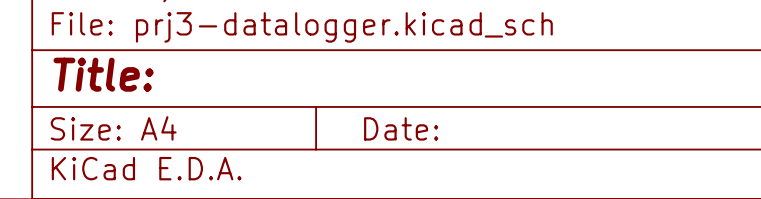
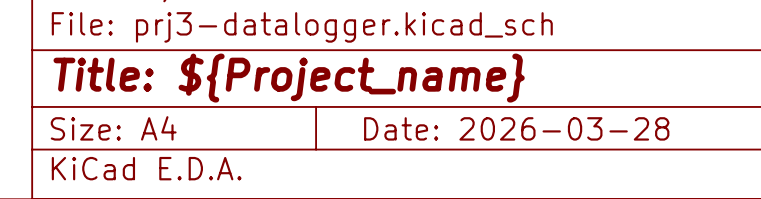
title block: Title: (103, 74) -> Title: ${Project_name} (289, 78)
title block: Date: (401, 128) -> Date: 2026-03-28 (516, 128)

